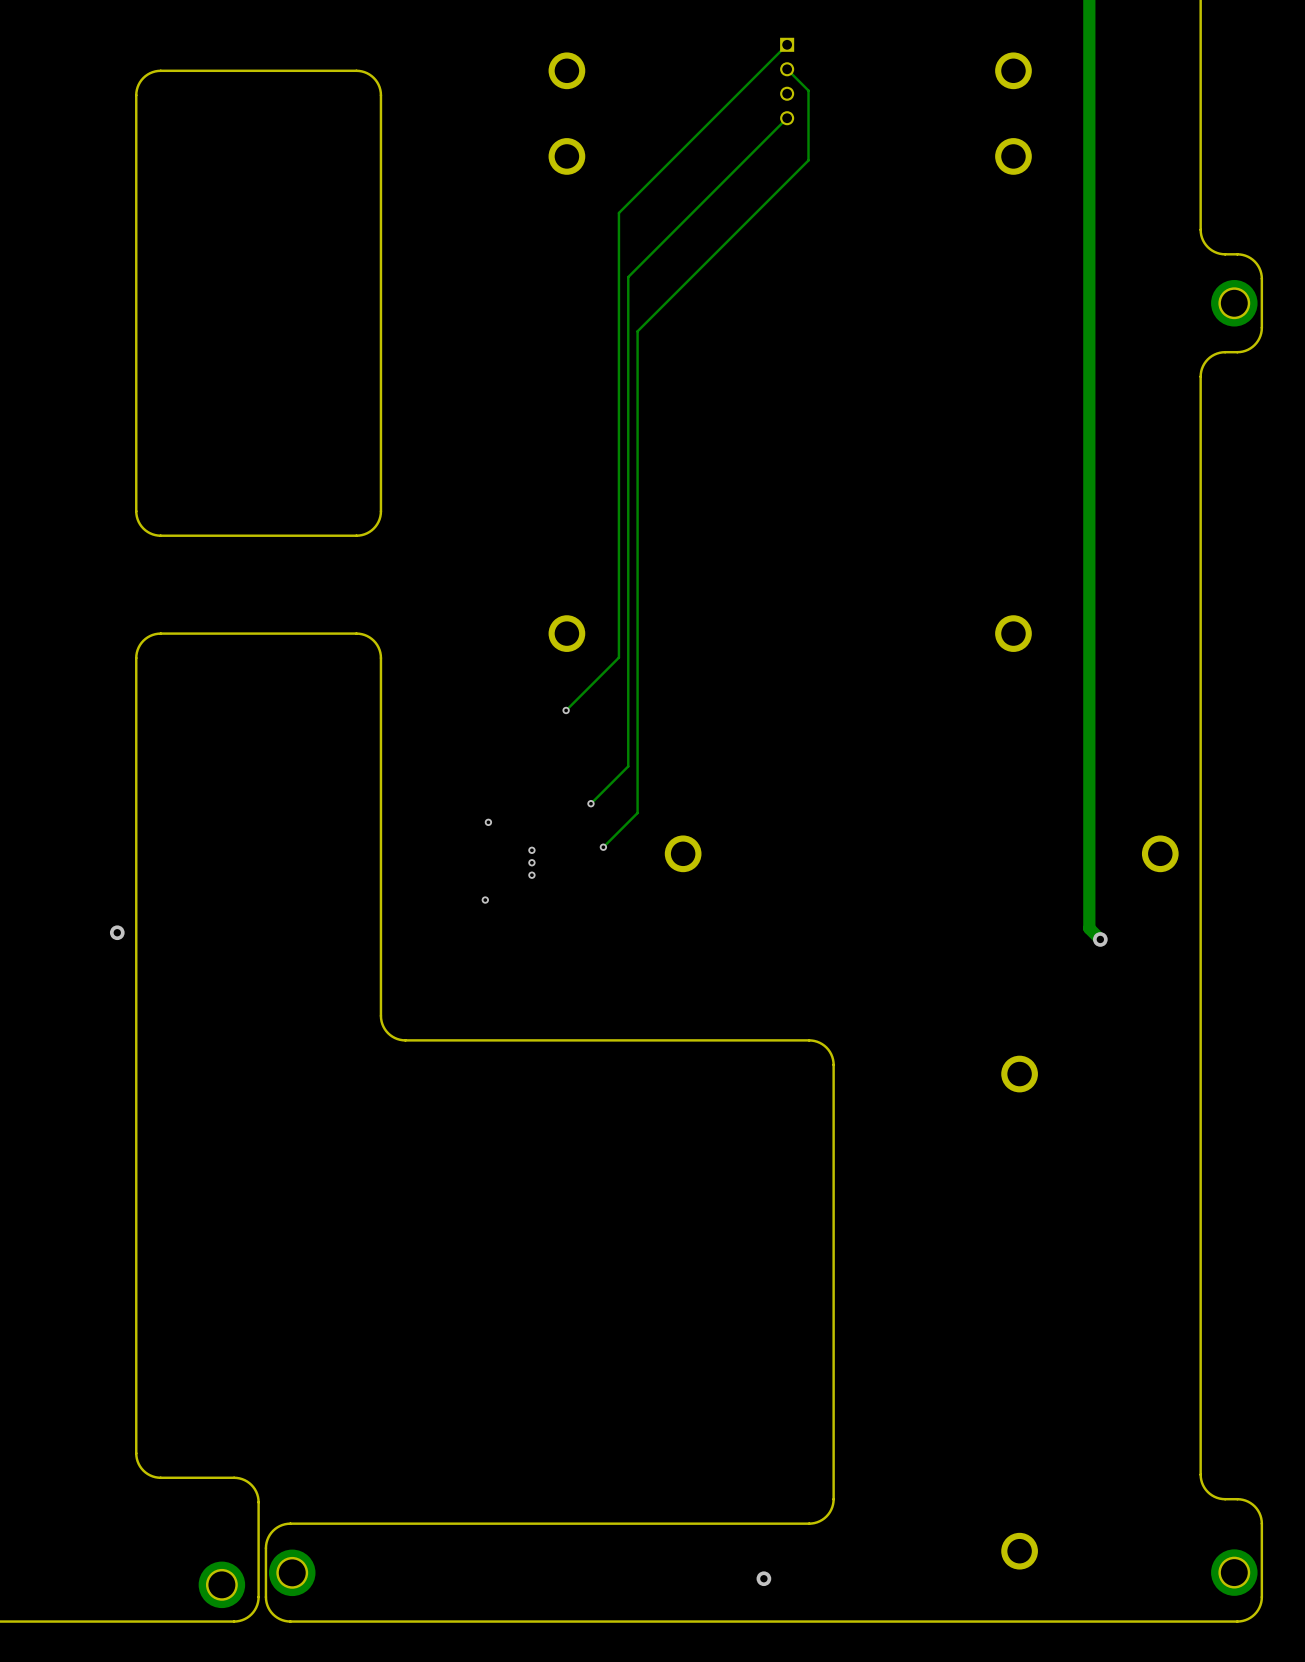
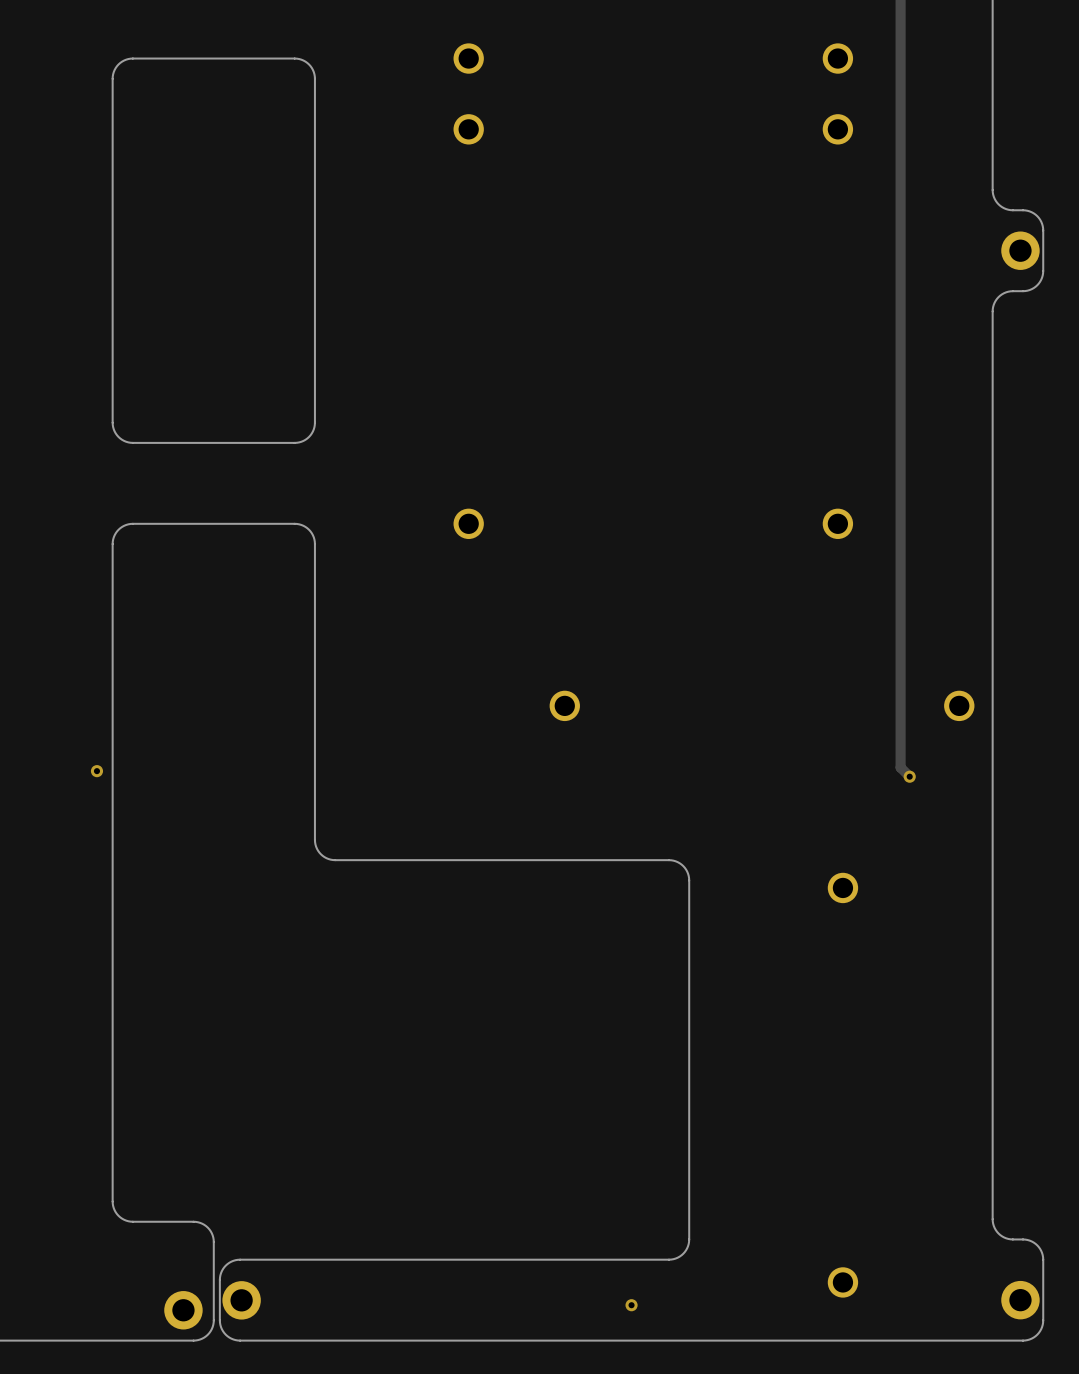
track: (787, 44) (618, 213) (618, 657) (566, 710) -> none
track: (787, 69) (808, 90) (808, 160) (637, 331) (637, 813) (603, 847) -> none
part: (787, 81) -> none
track: (787, 118) (628, 277) (628, 766) (590, 803) -> none
via: (566, 710) -> none
via: (590, 803) -> none
via: (488, 822) -> none
via: (603, 847) -> none
via: (531, 850) -> none
via: (531, 862) -> none
via: (531, 875) -> none
via: (485, 900) -> none

